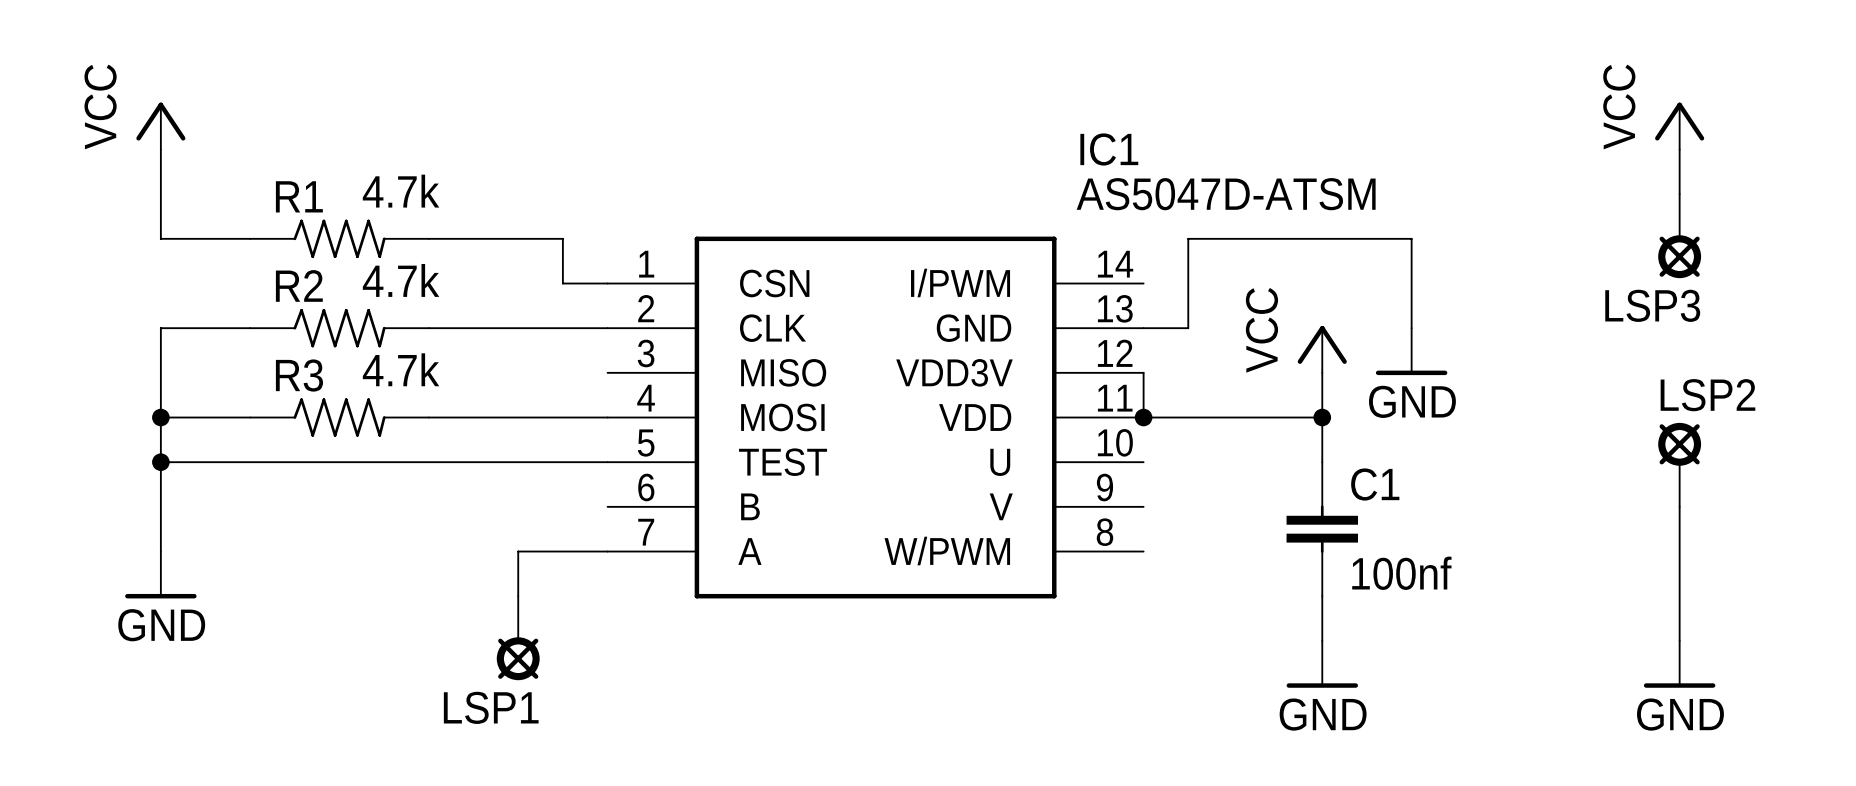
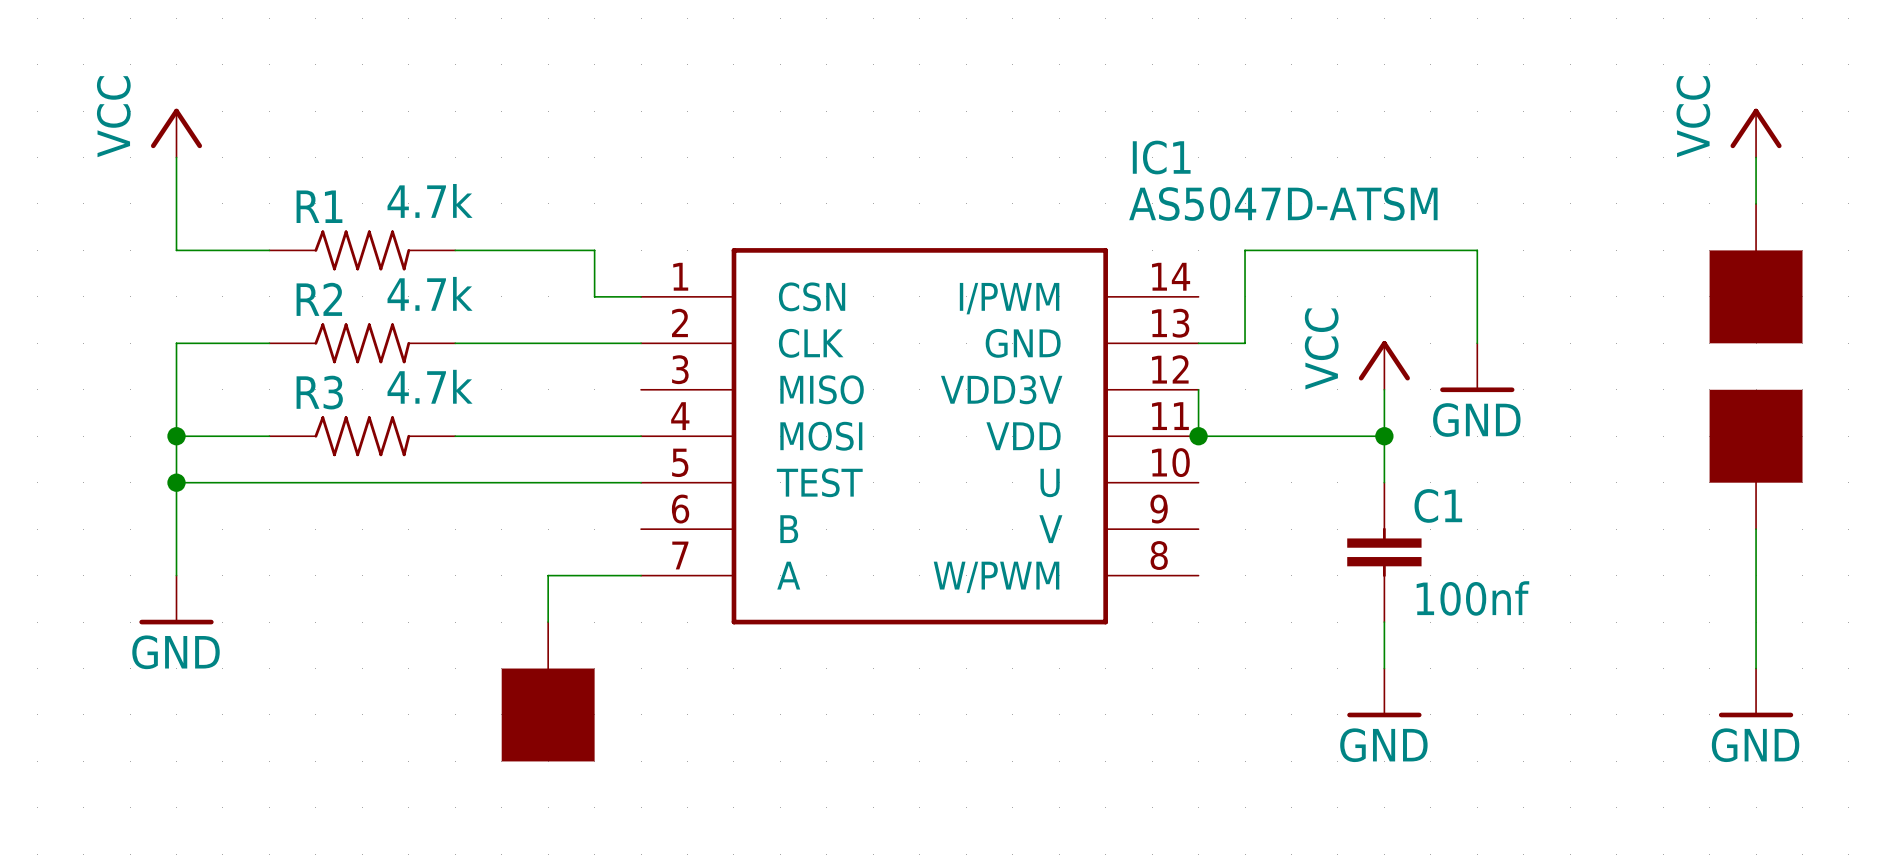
LSP3: (1679, 236) -> none
part: none -> (1756, 273)
part: none -> (1756, 459)
LSP2: (1679, 464) -> none
LSP1: (518, 638) -> none
part: none -> (548, 691)

